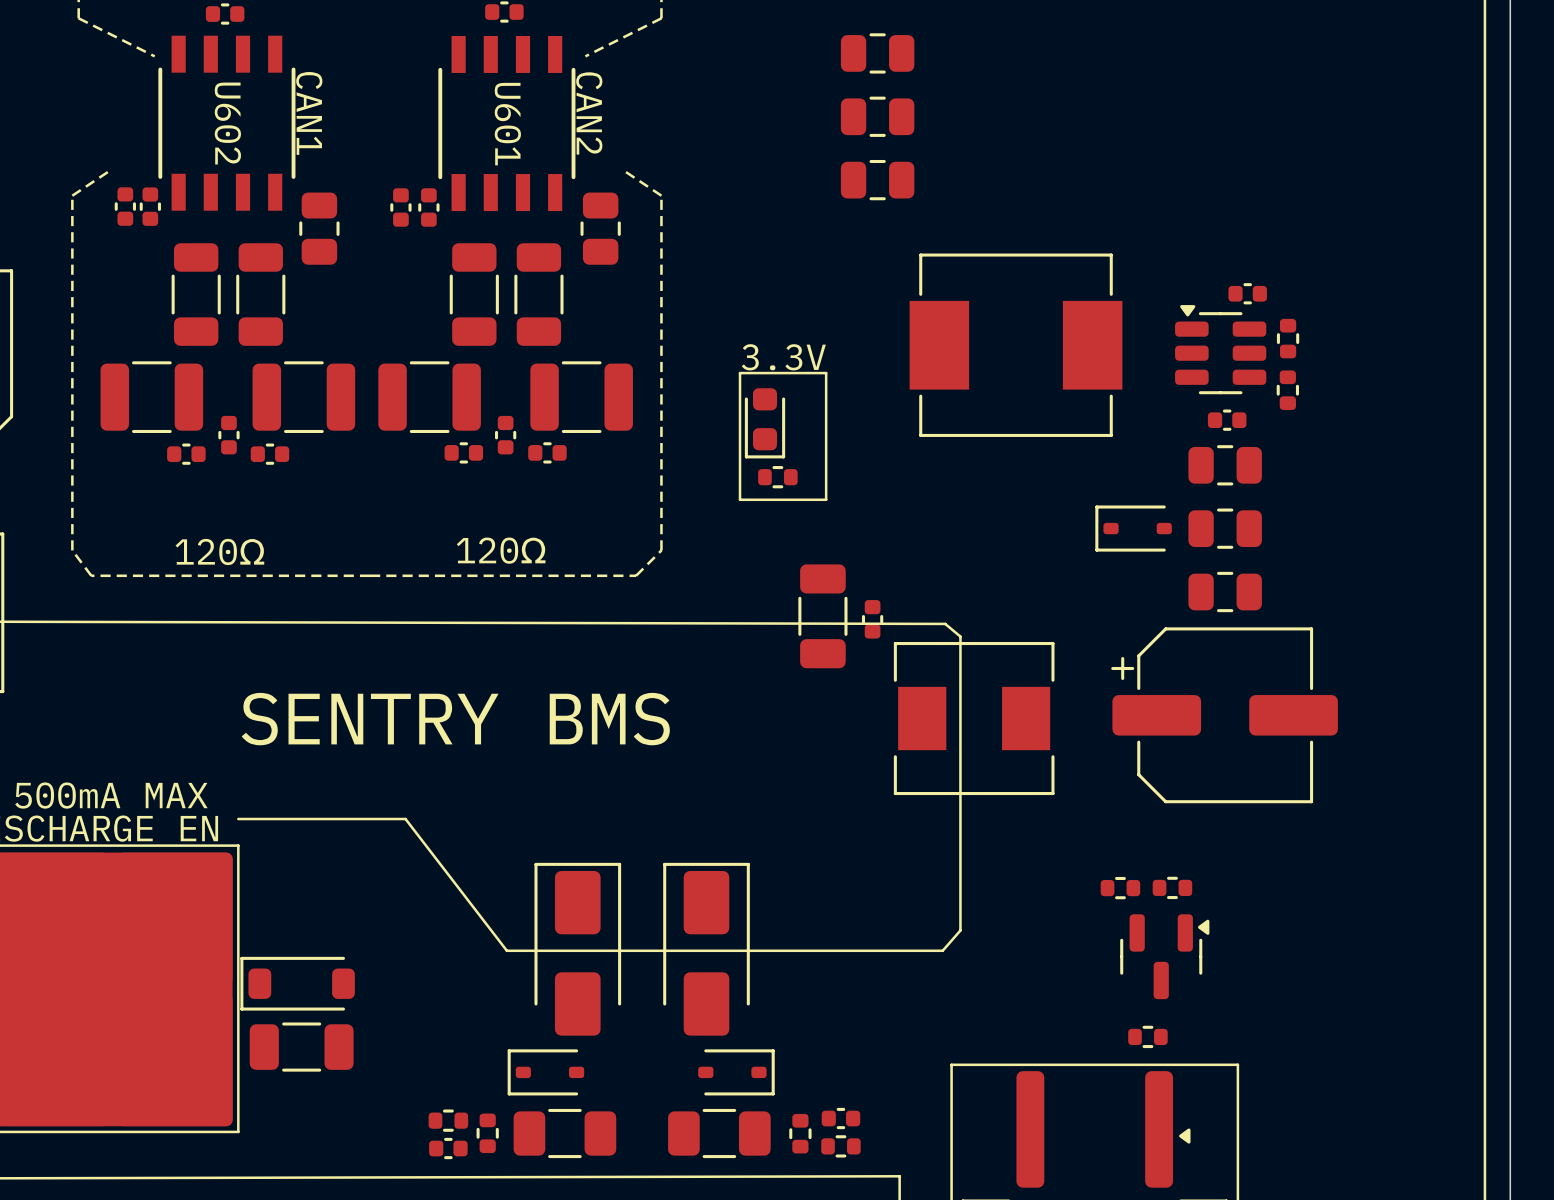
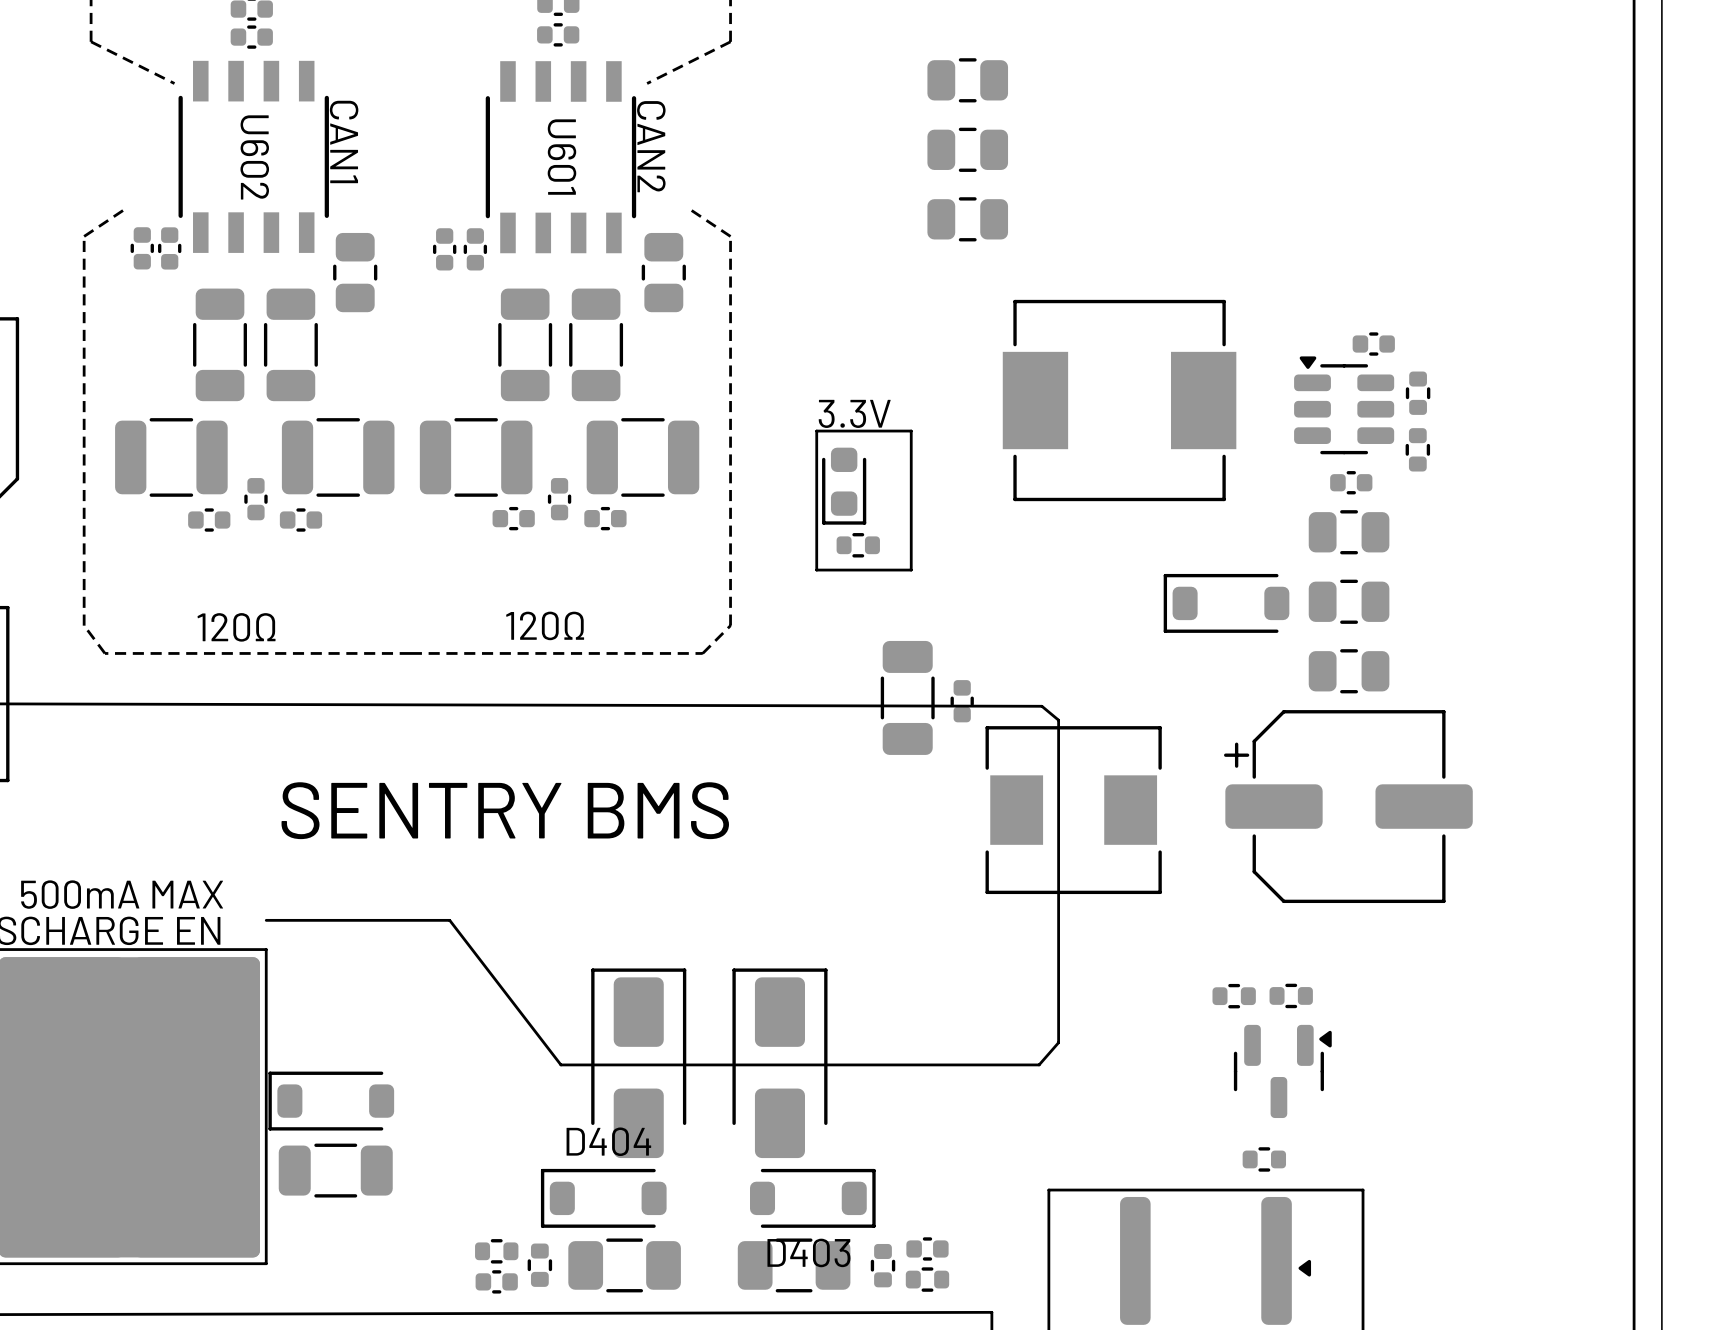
part footprint: [1095, 505, 1172, 552] -> [1163, 573, 1290, 633]
part: (545, 1072) -> none
D404: none -> (603, 1198)
part: (736, 1072) -> none
D403: none -> (812, 1198)

